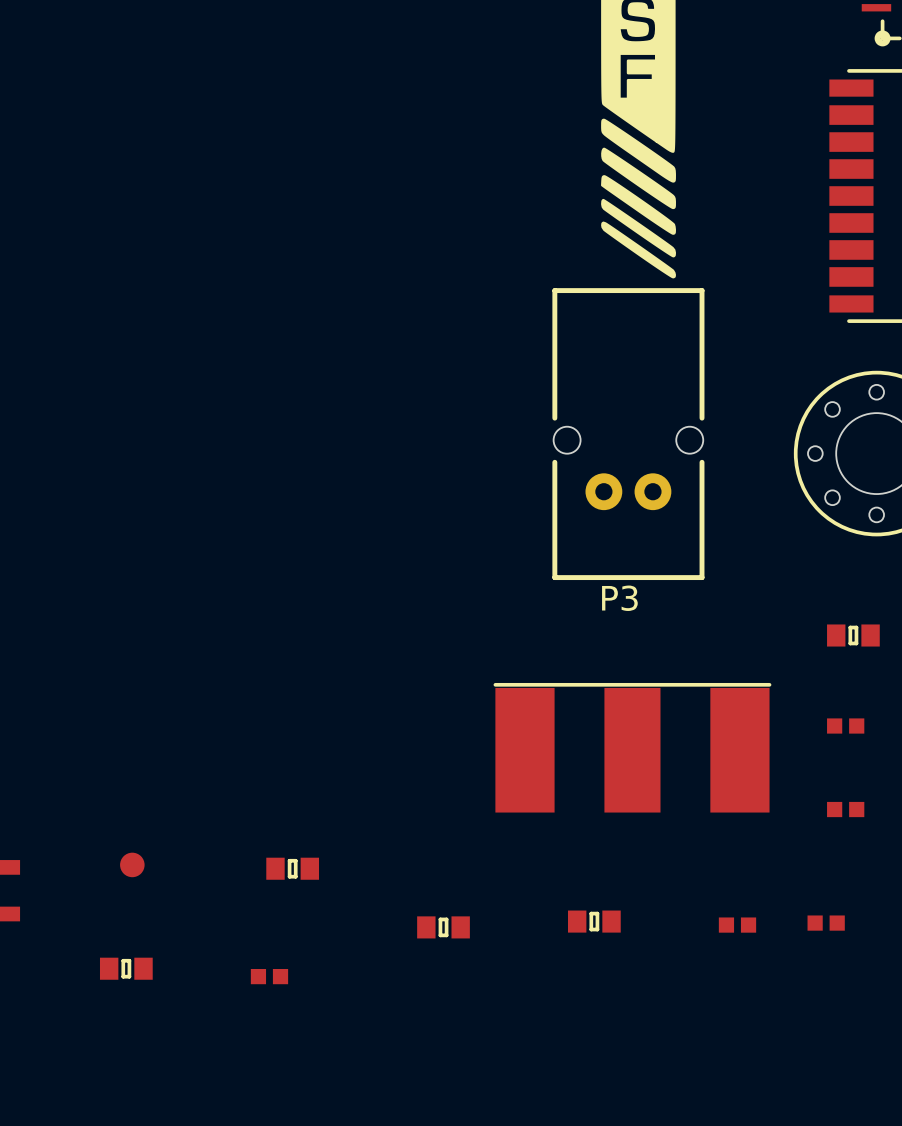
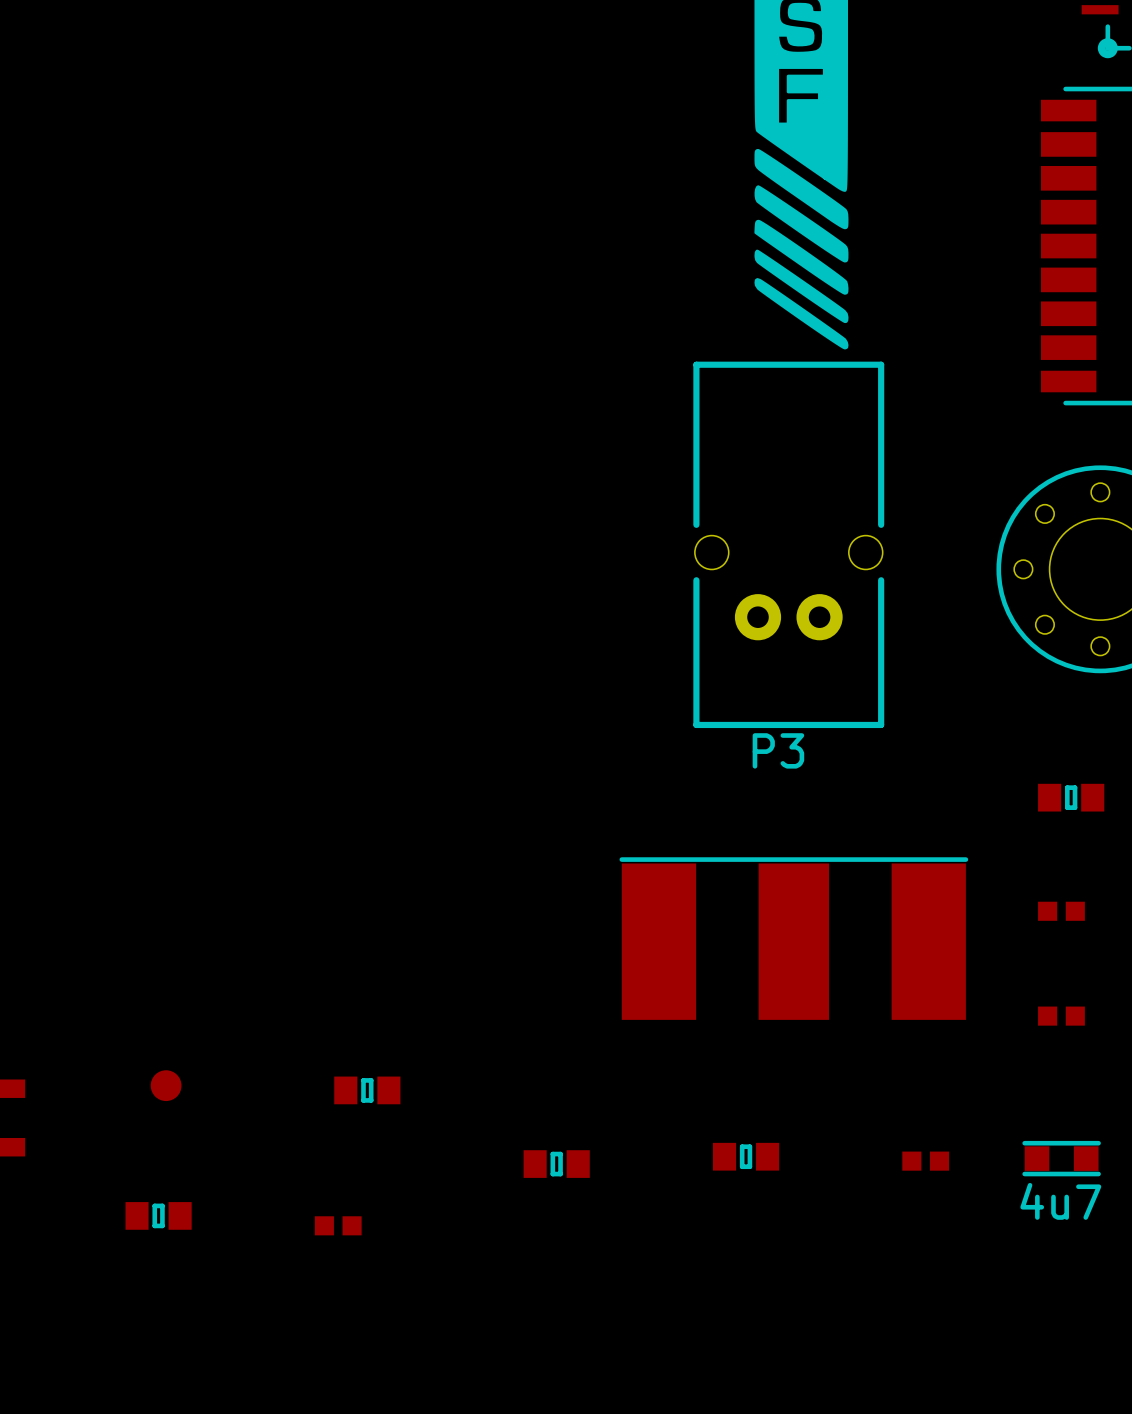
part footprint: [807, 915, 845, 931] -> [1022, 1140, 1101, 1177]
part value: none -> 4u7 (1060, 1201)

